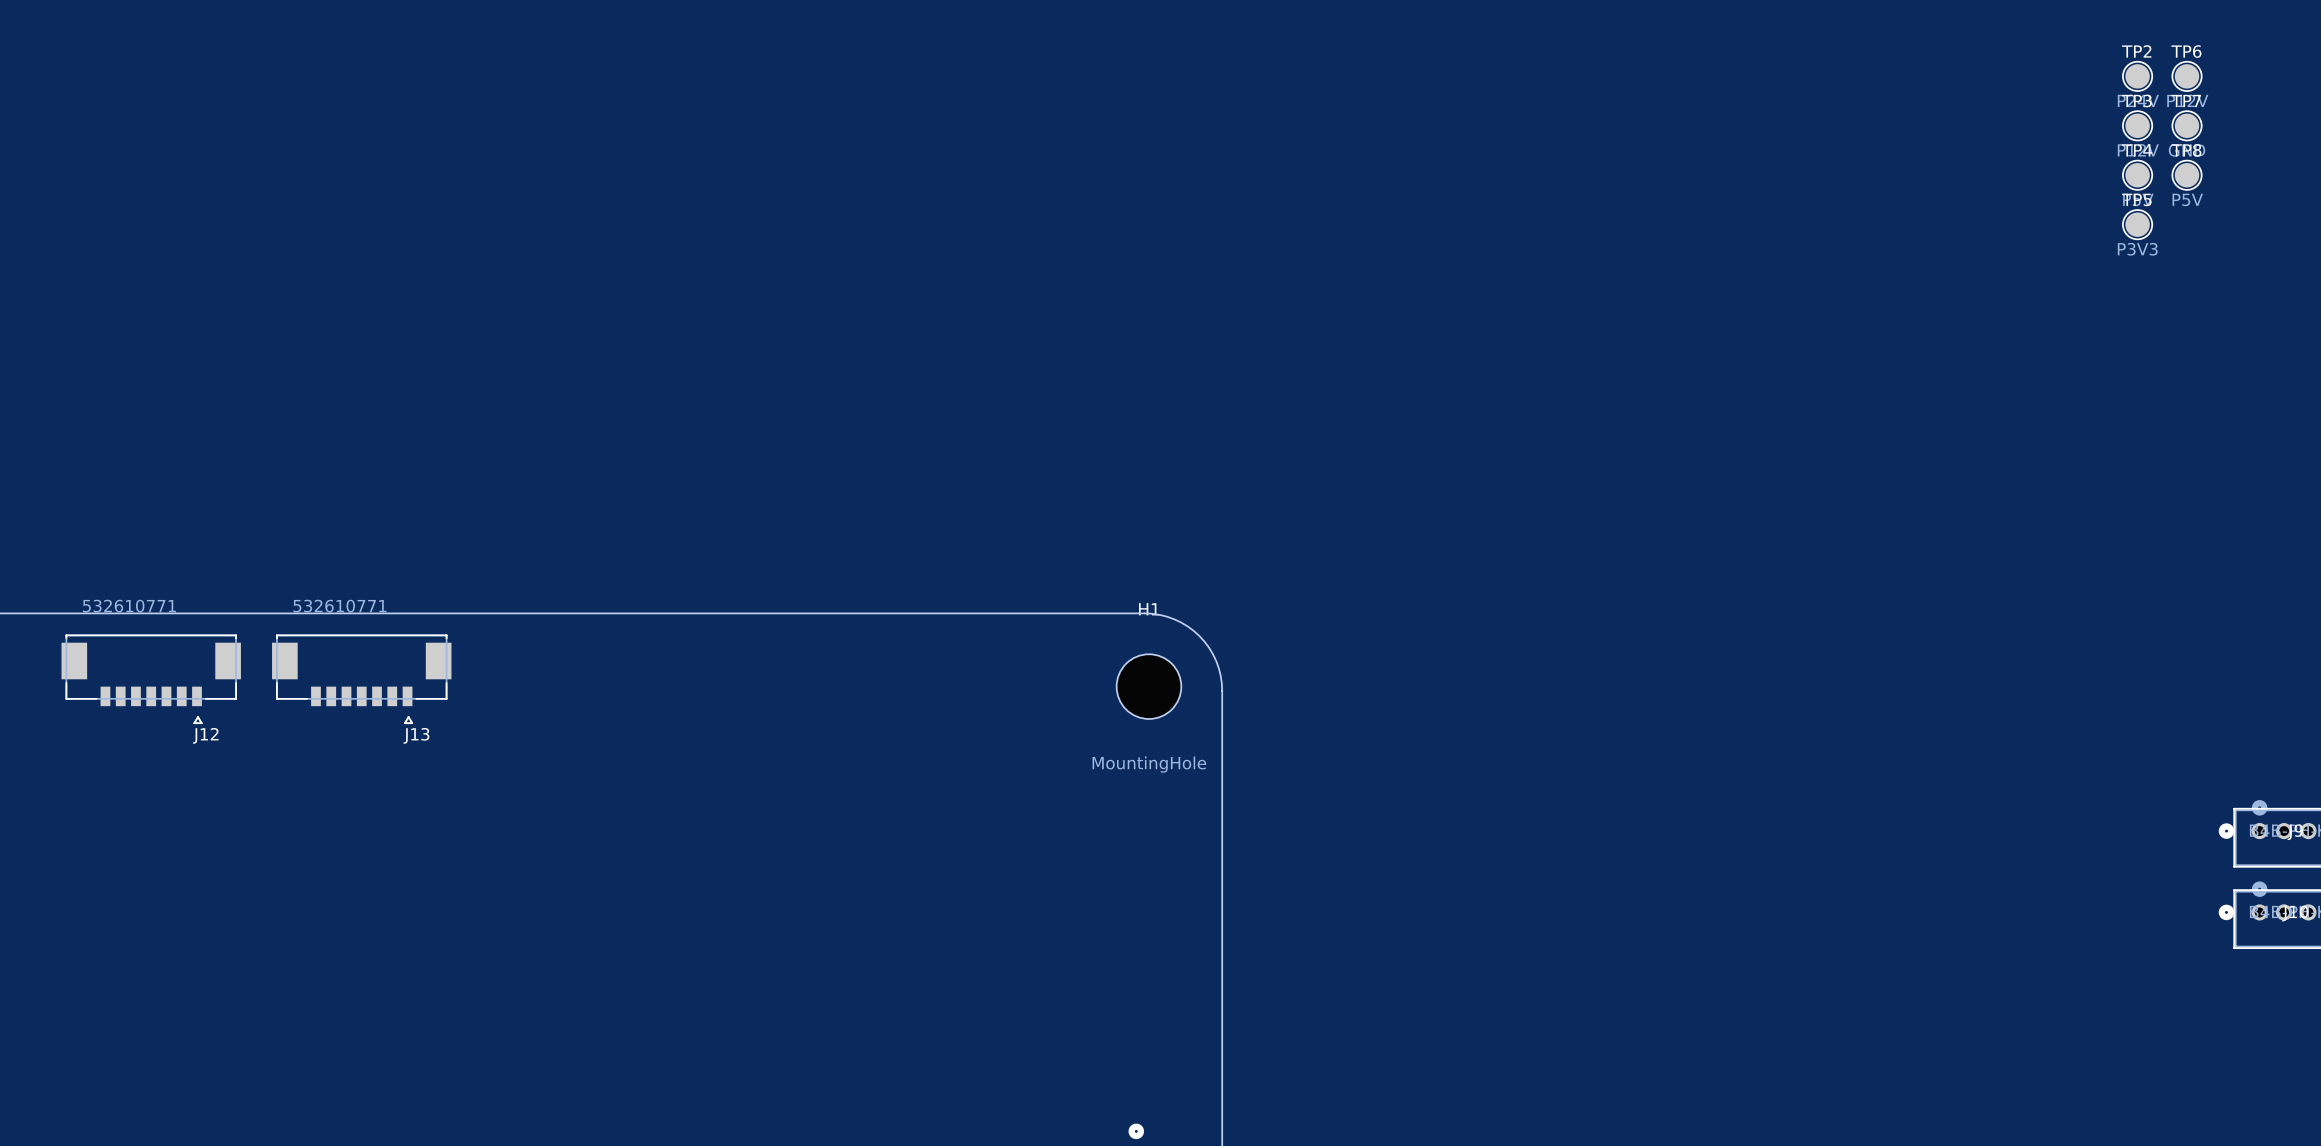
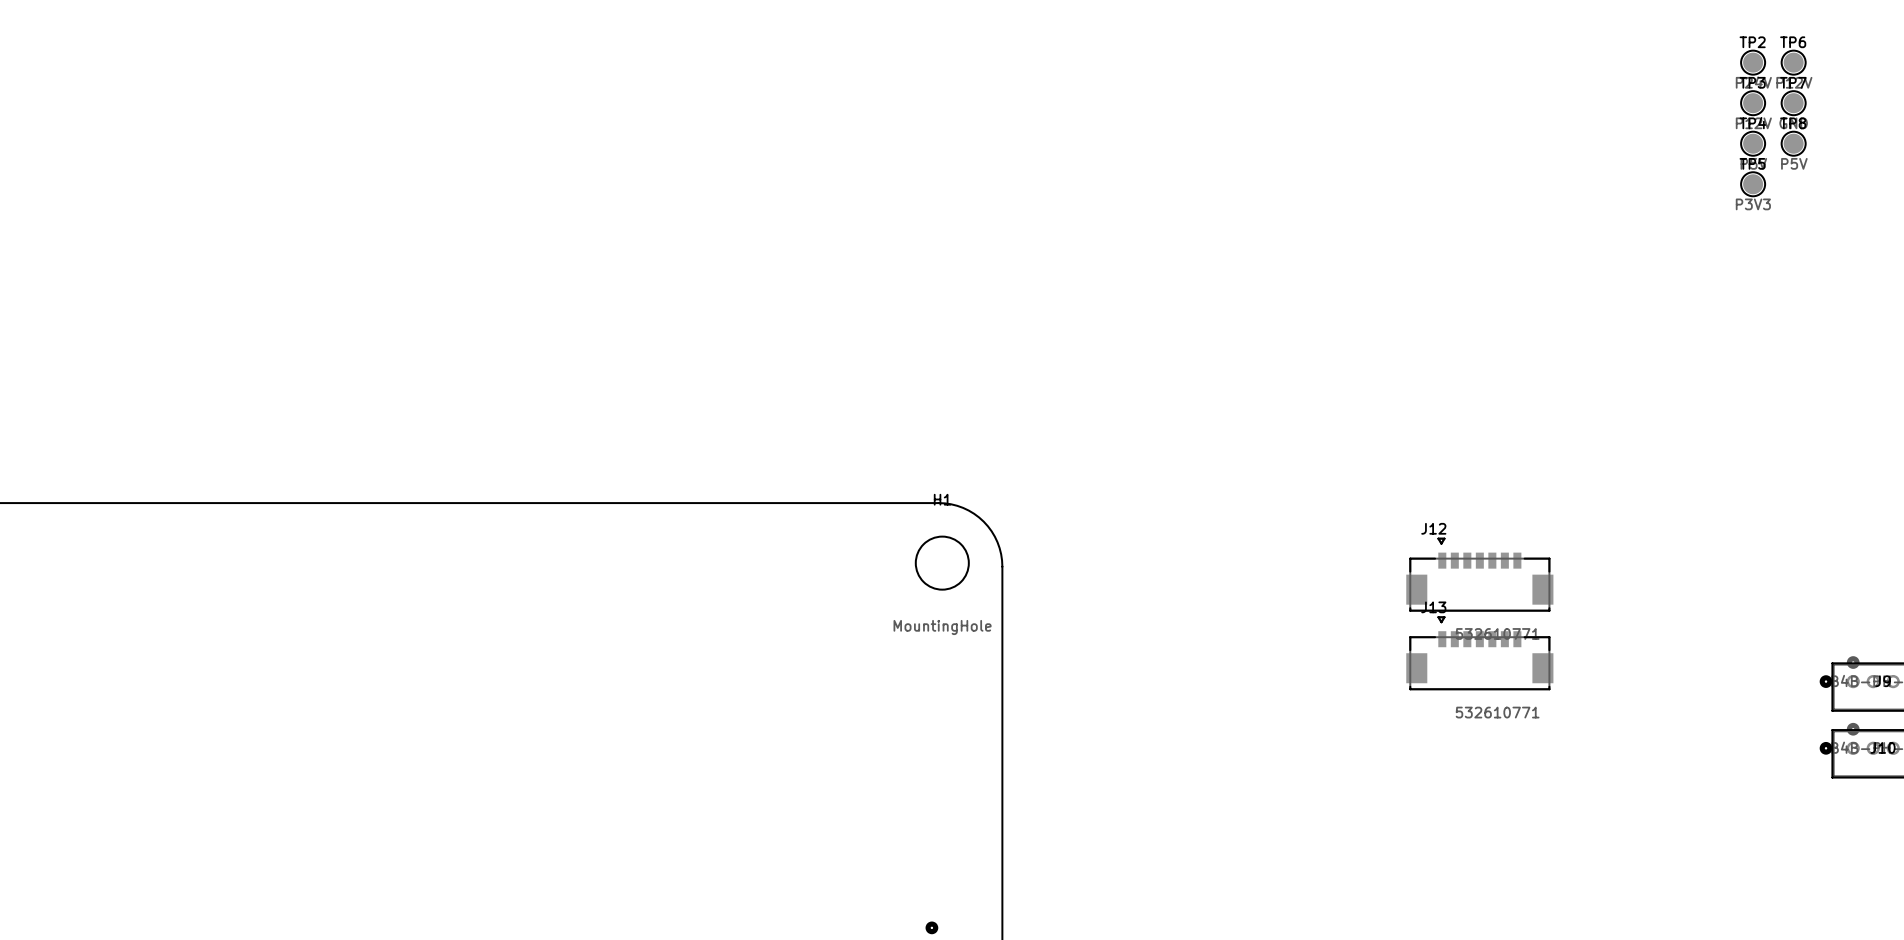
J12 rotation: 0° (151, 679) -> 180° (1479, 574)
J12 position: (151, 679) -> (1479, 574)
J13 rotation: 0° (361, 679) -> 180° (1479, 653)
J13 position: (361, 679) -> (1479, 653)

